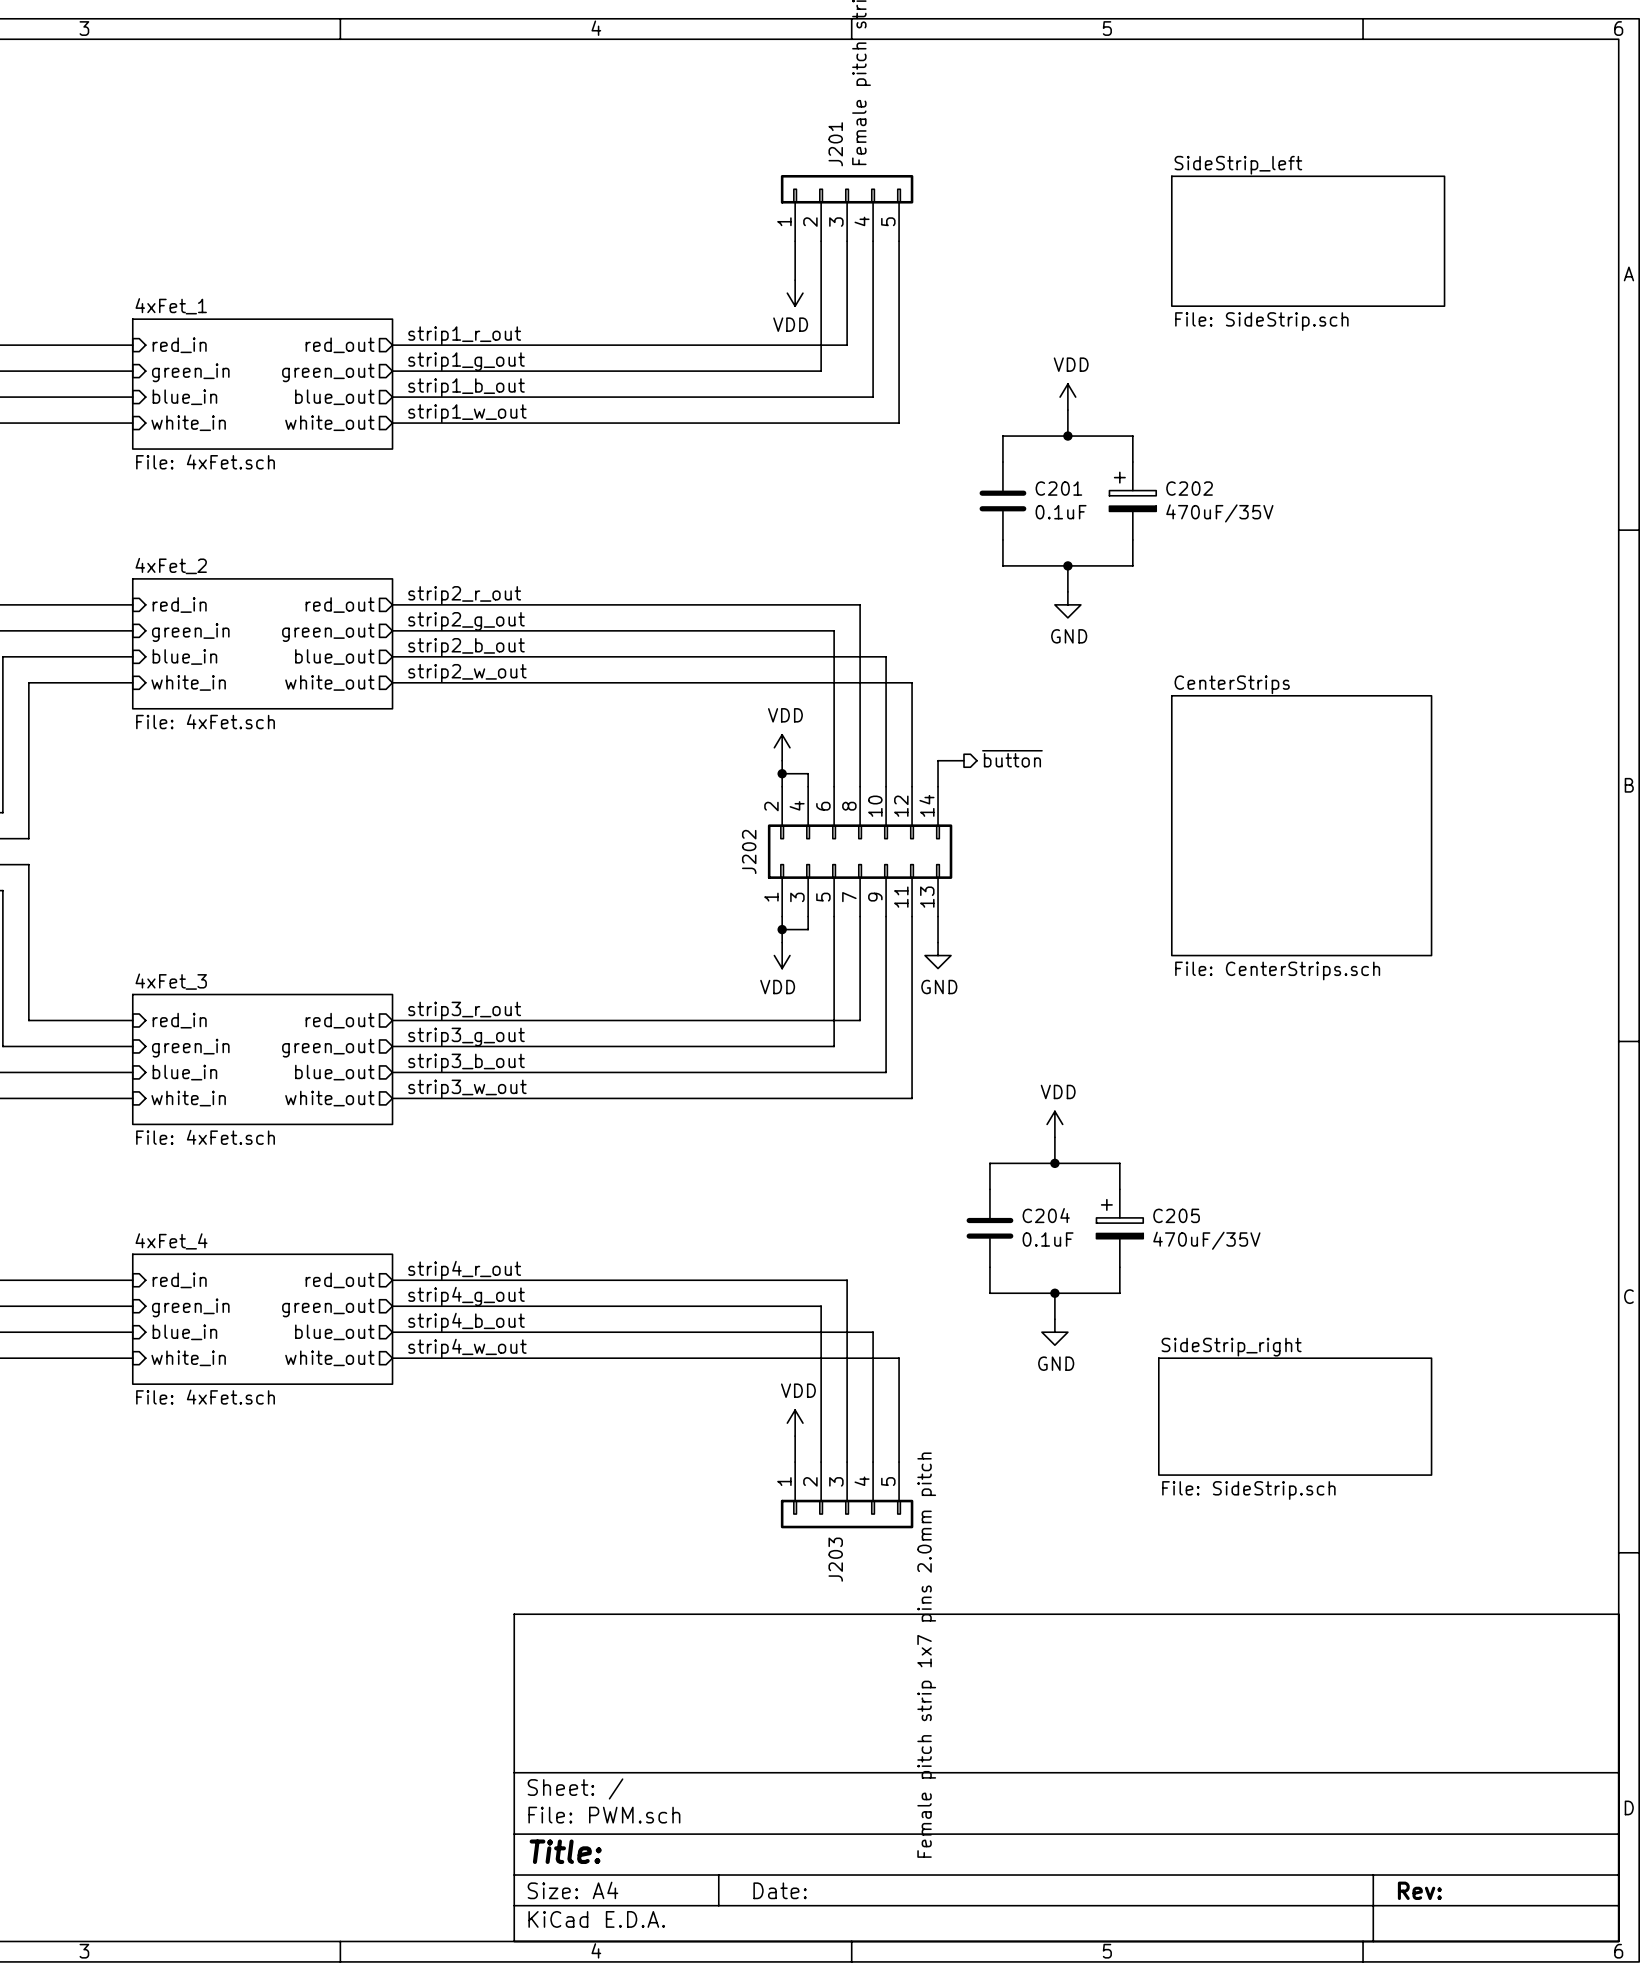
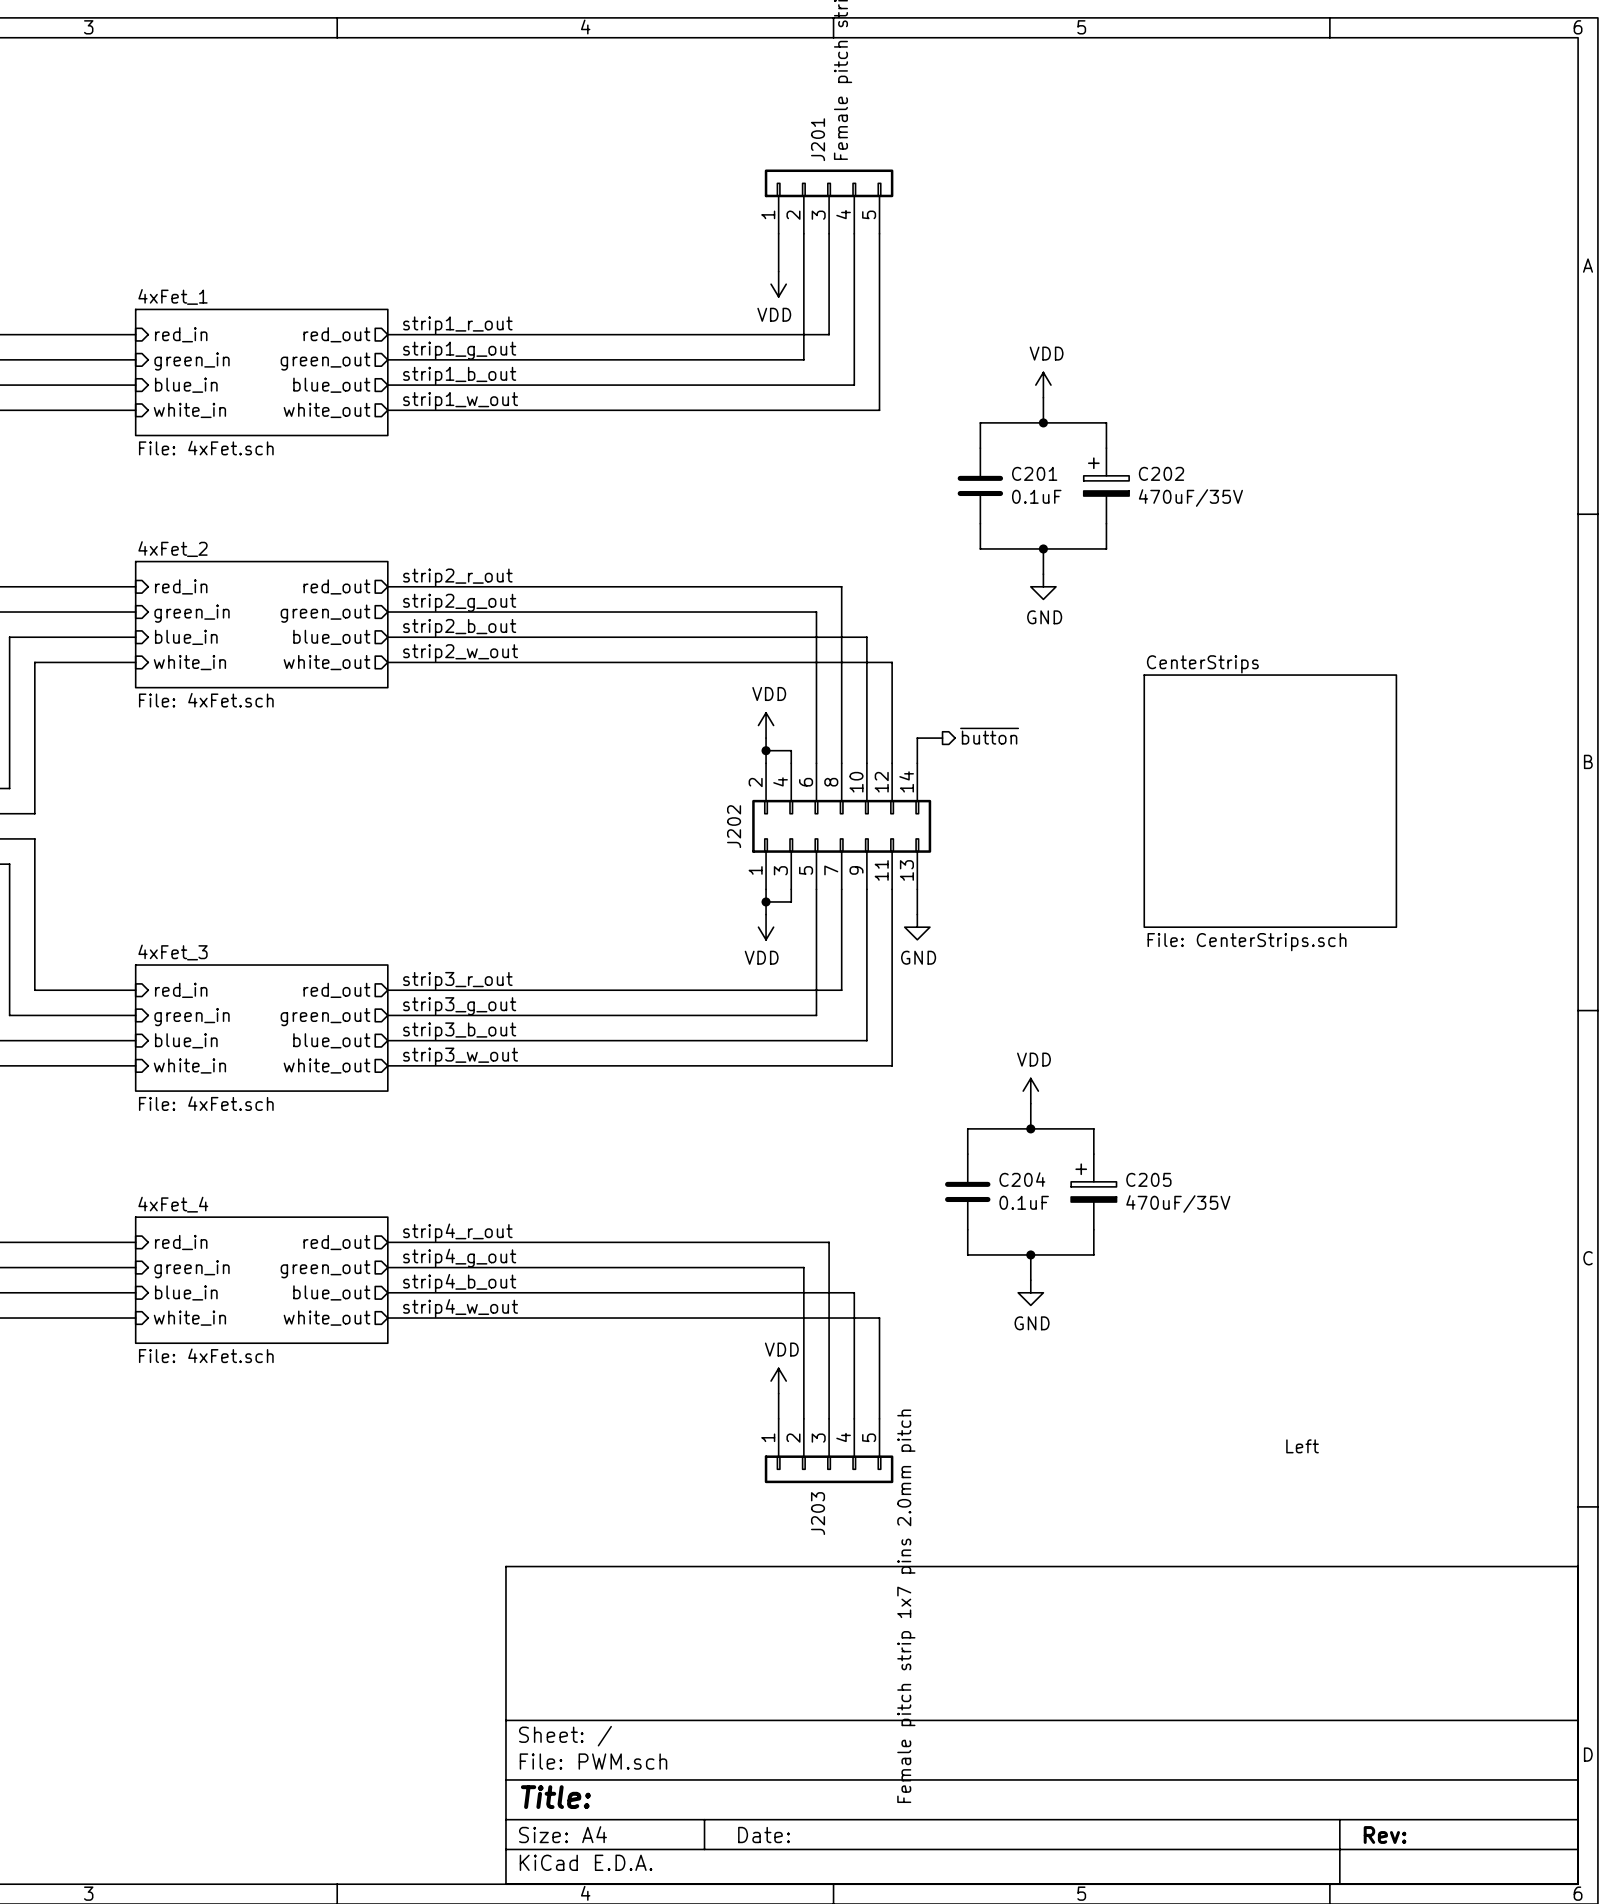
sheet SideStrip_left: File: SideStrip.sch (1308, 241) -> none
sheet SideStrip_right: File: SideStrip.sch (1295, 1416) -> none
text: none -> Left (1302, 1446)

